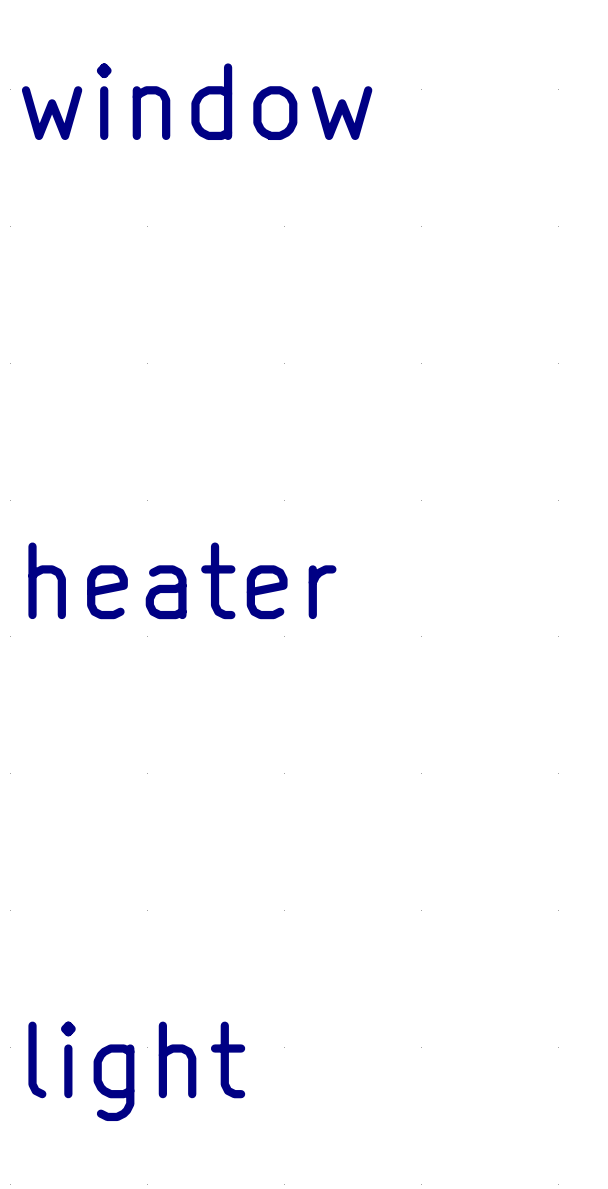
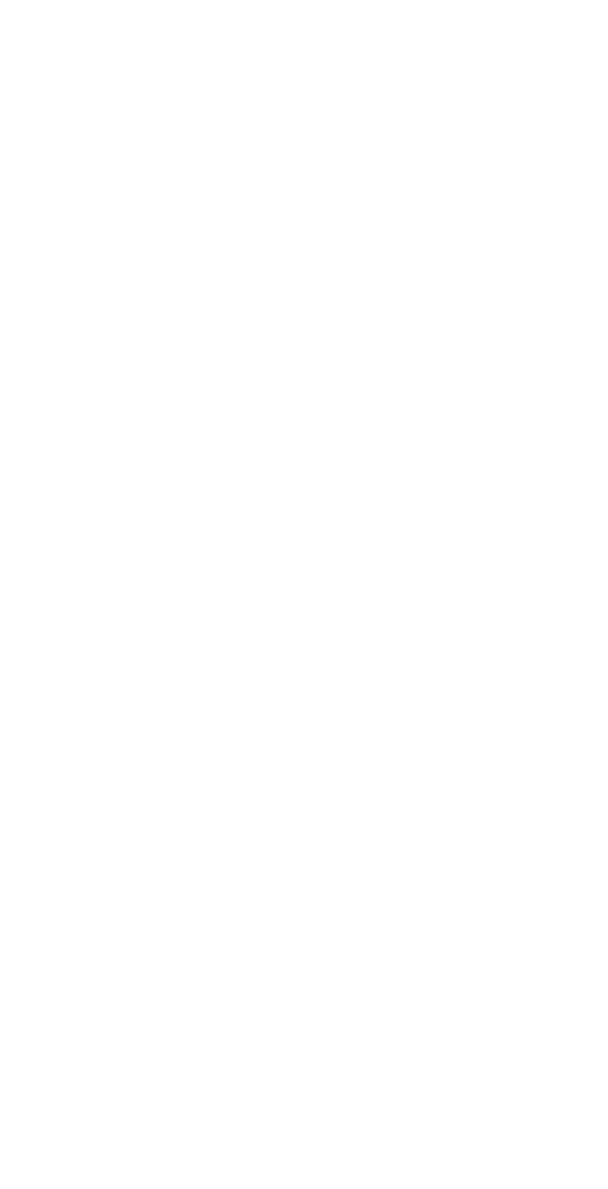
text: window (197, 101) -> none
text: heater (182, 580) -> none
text: light (136, 1071) -> none

